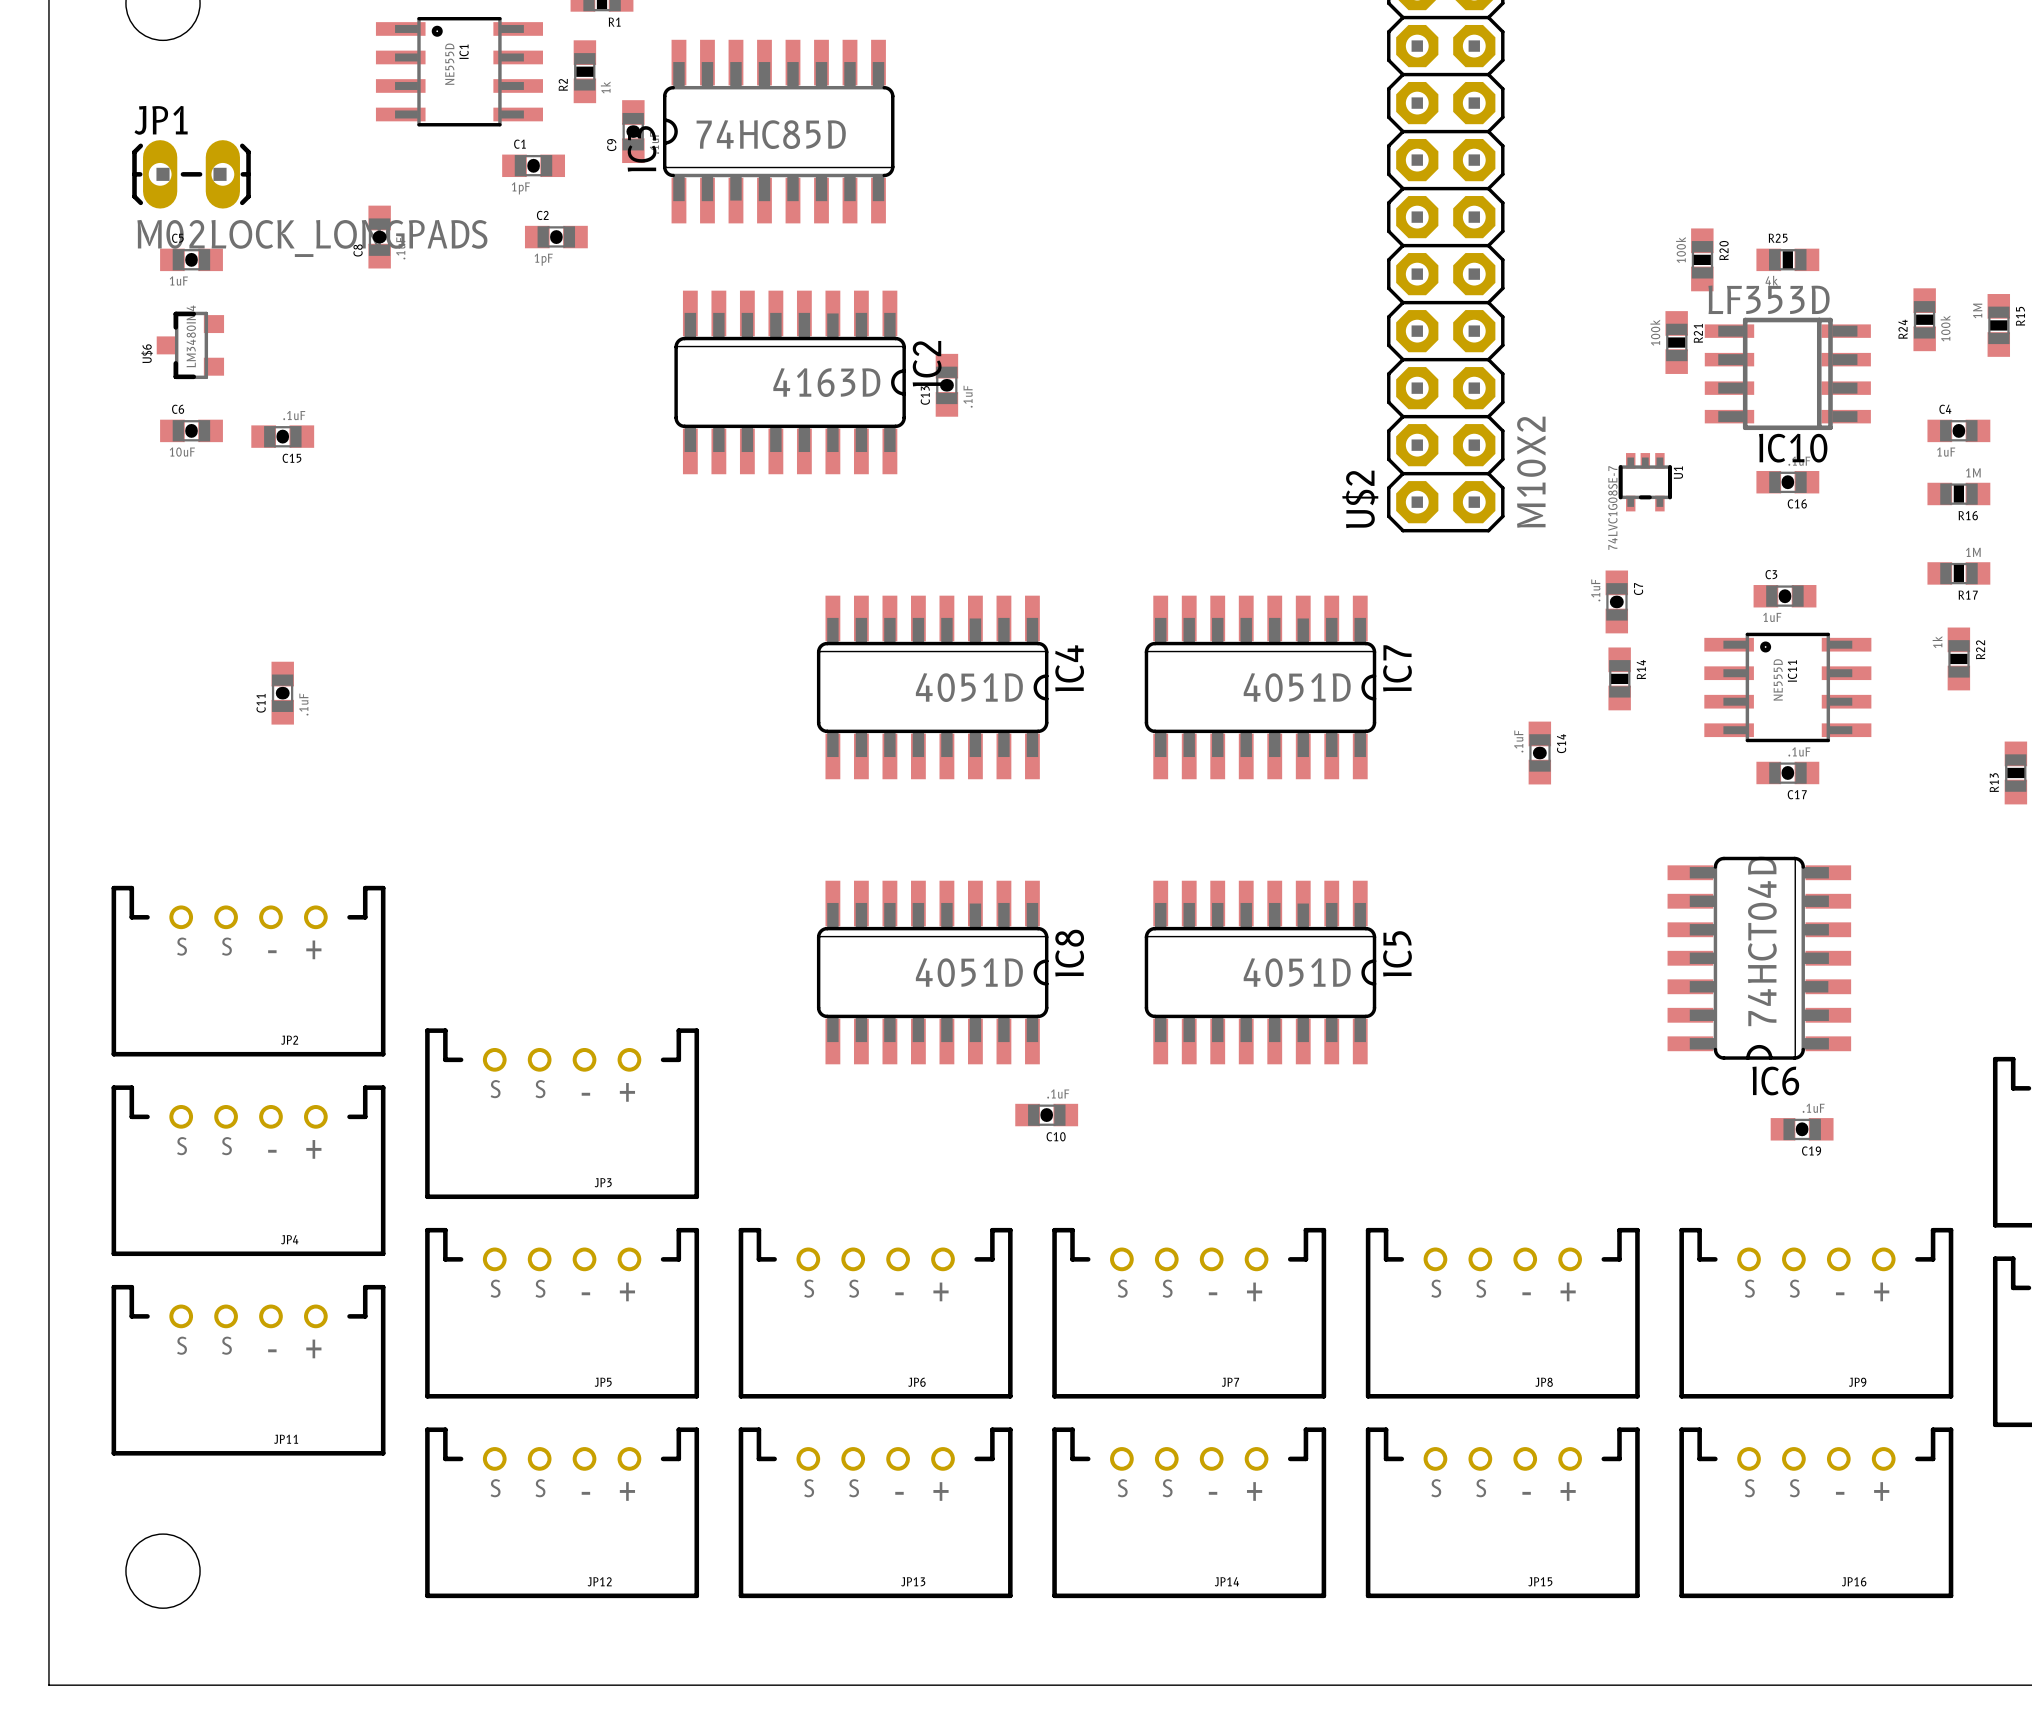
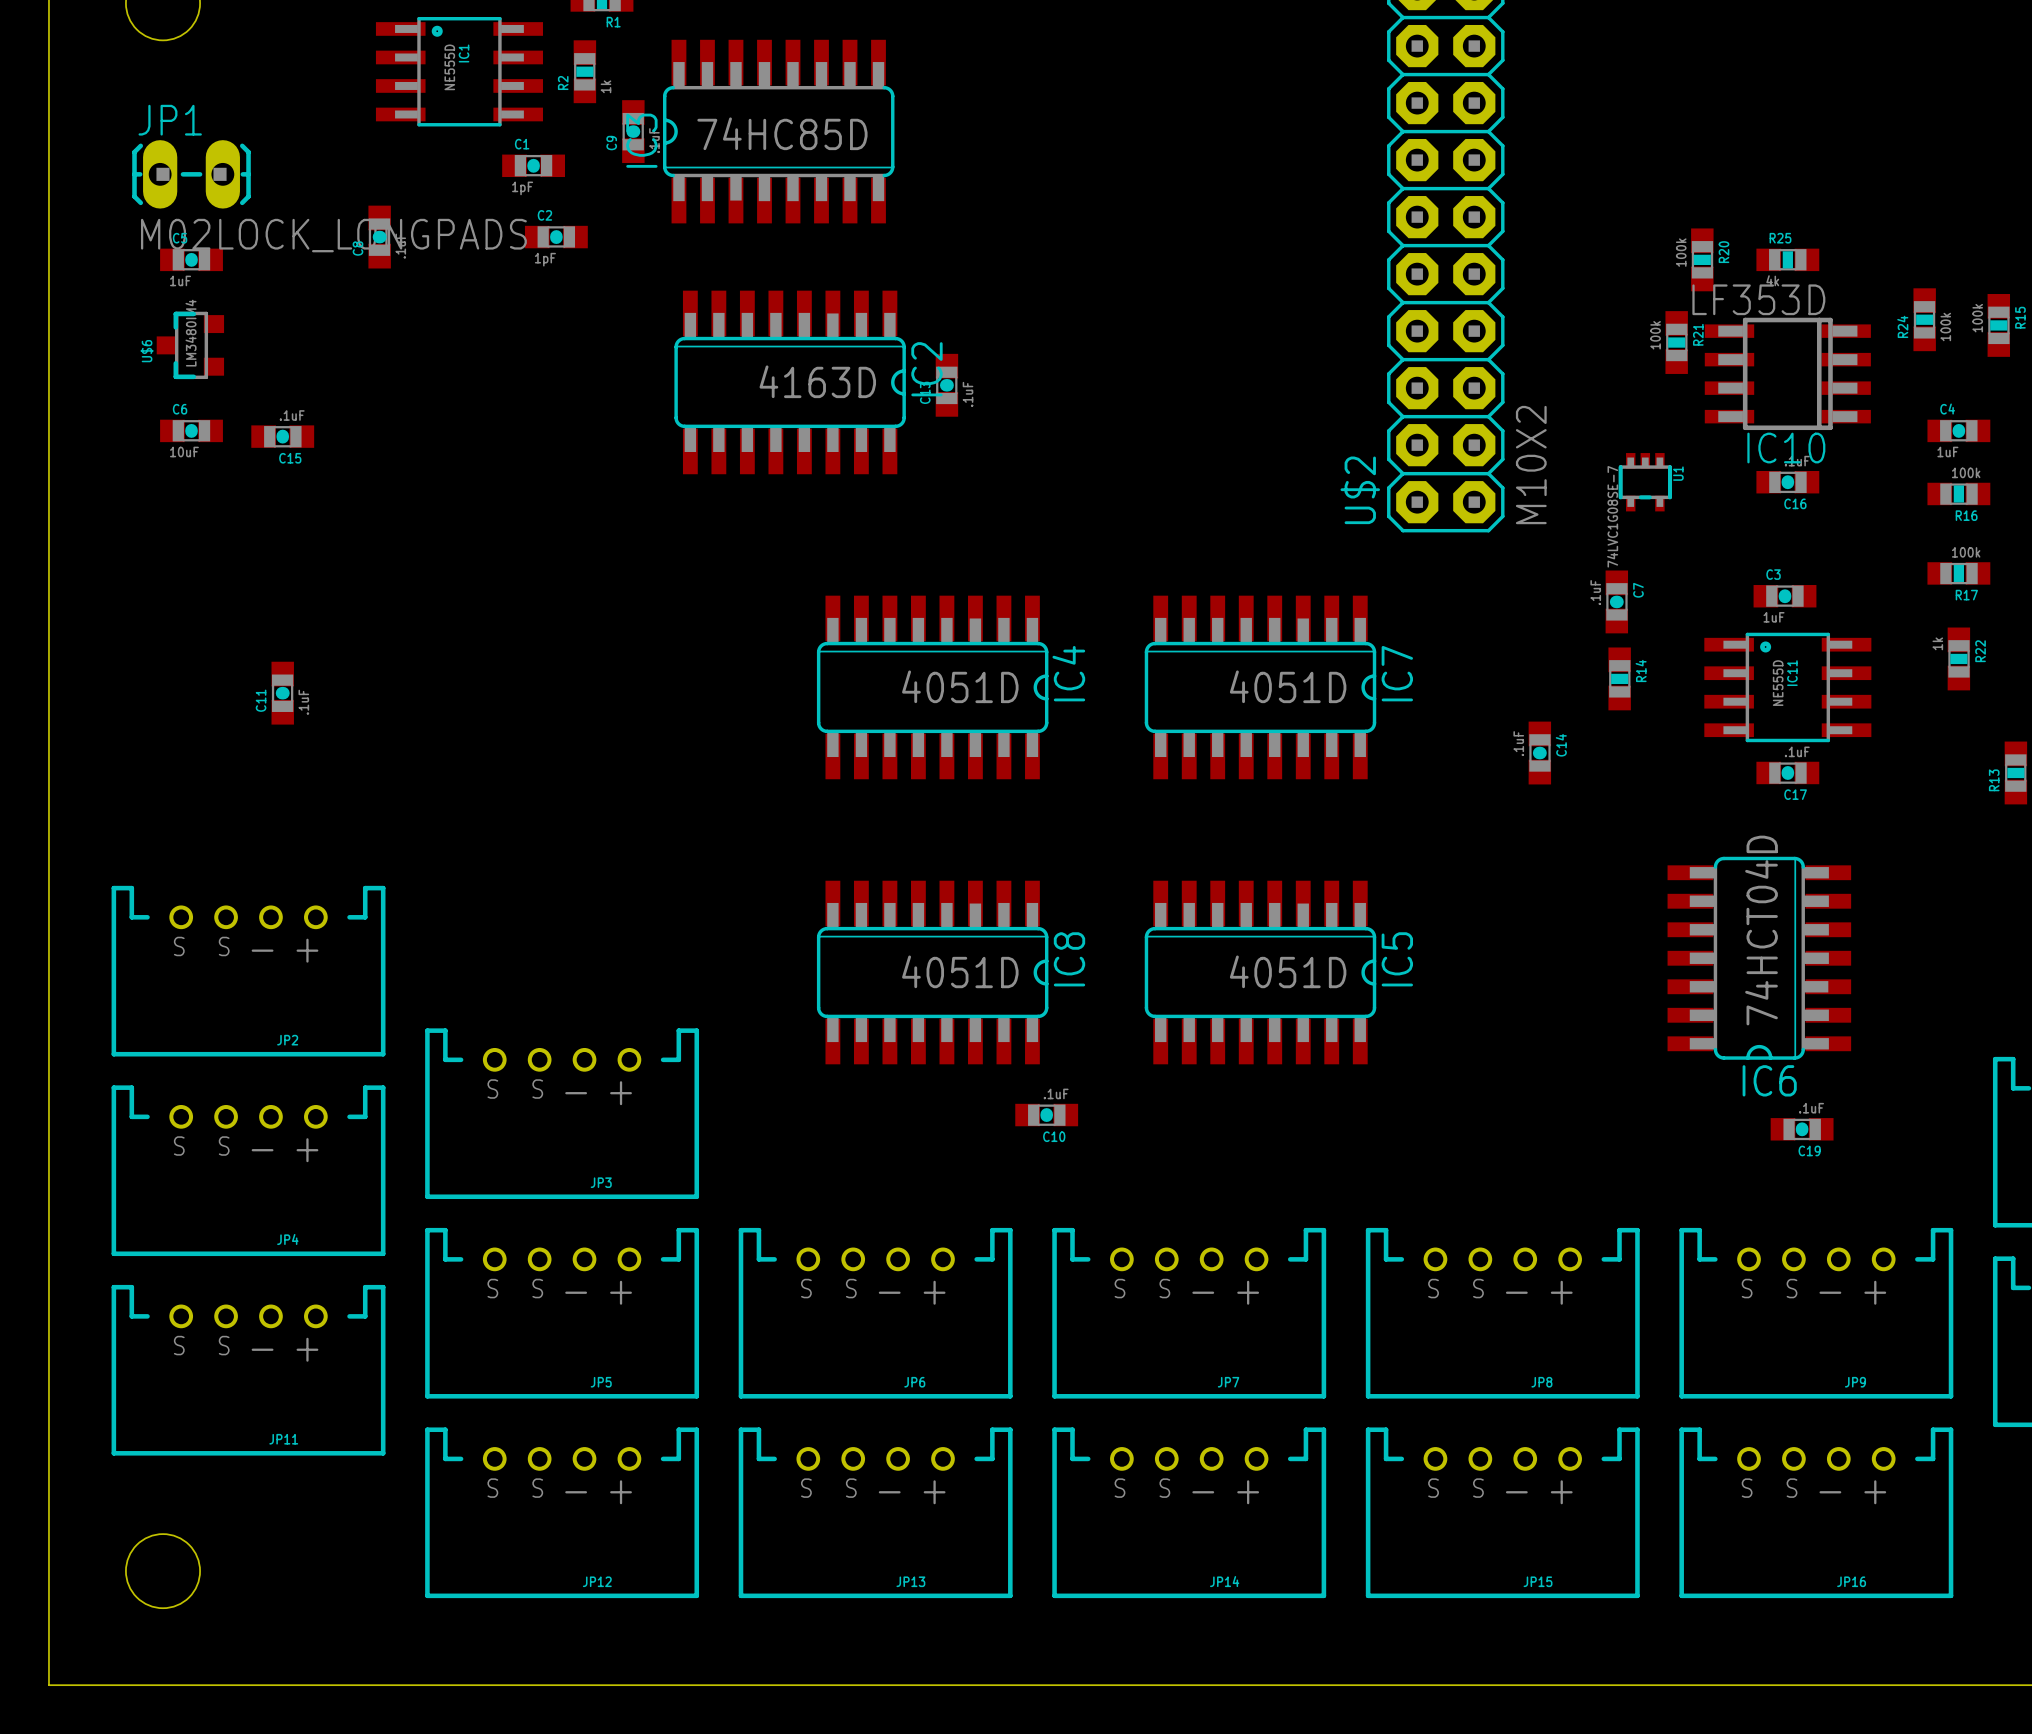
R15 value: 1M (1977, 310) -> 100k (1977, 318)
R16 value: 1M (1973, 472) -> 100k (1966, 472)
R17 value: 1M (1973, 552) -> 100k (1966, 552)

